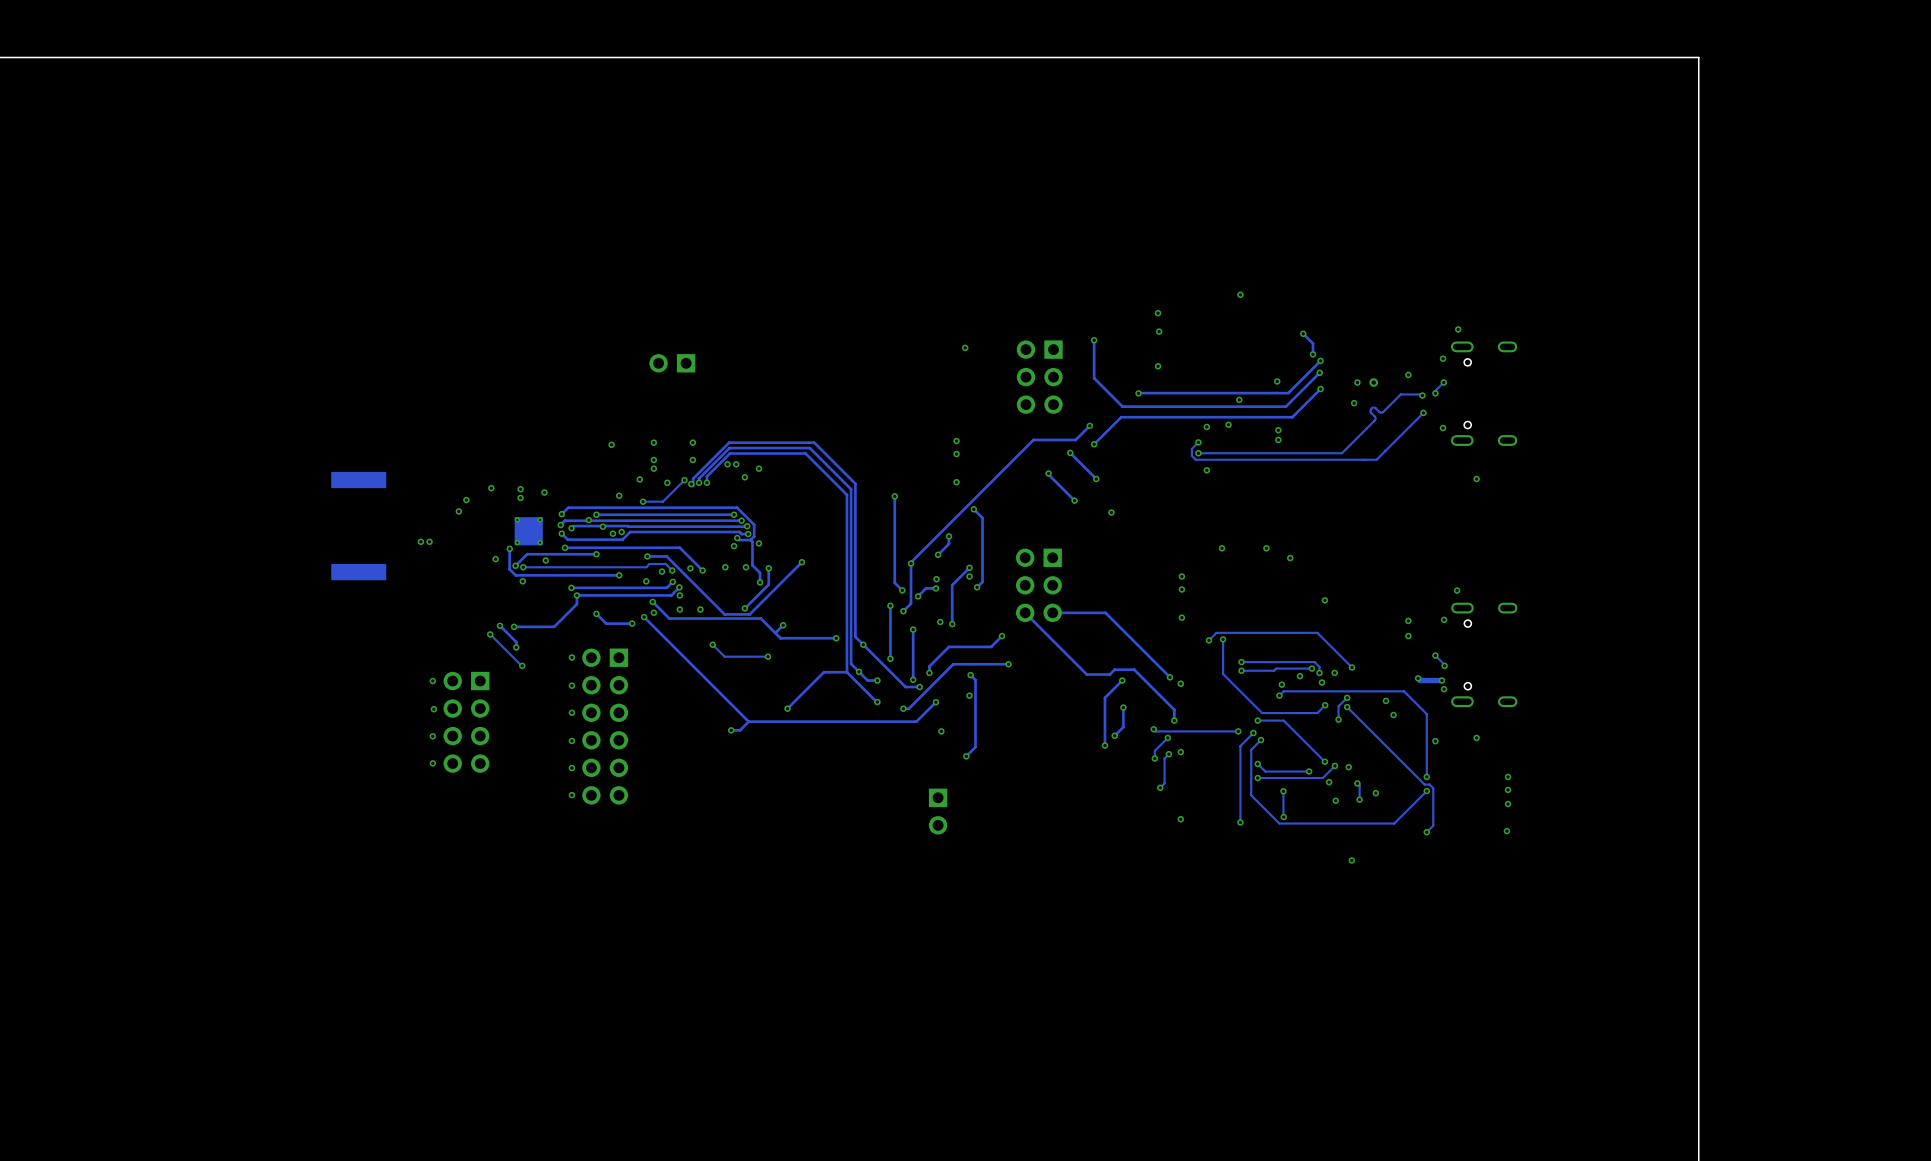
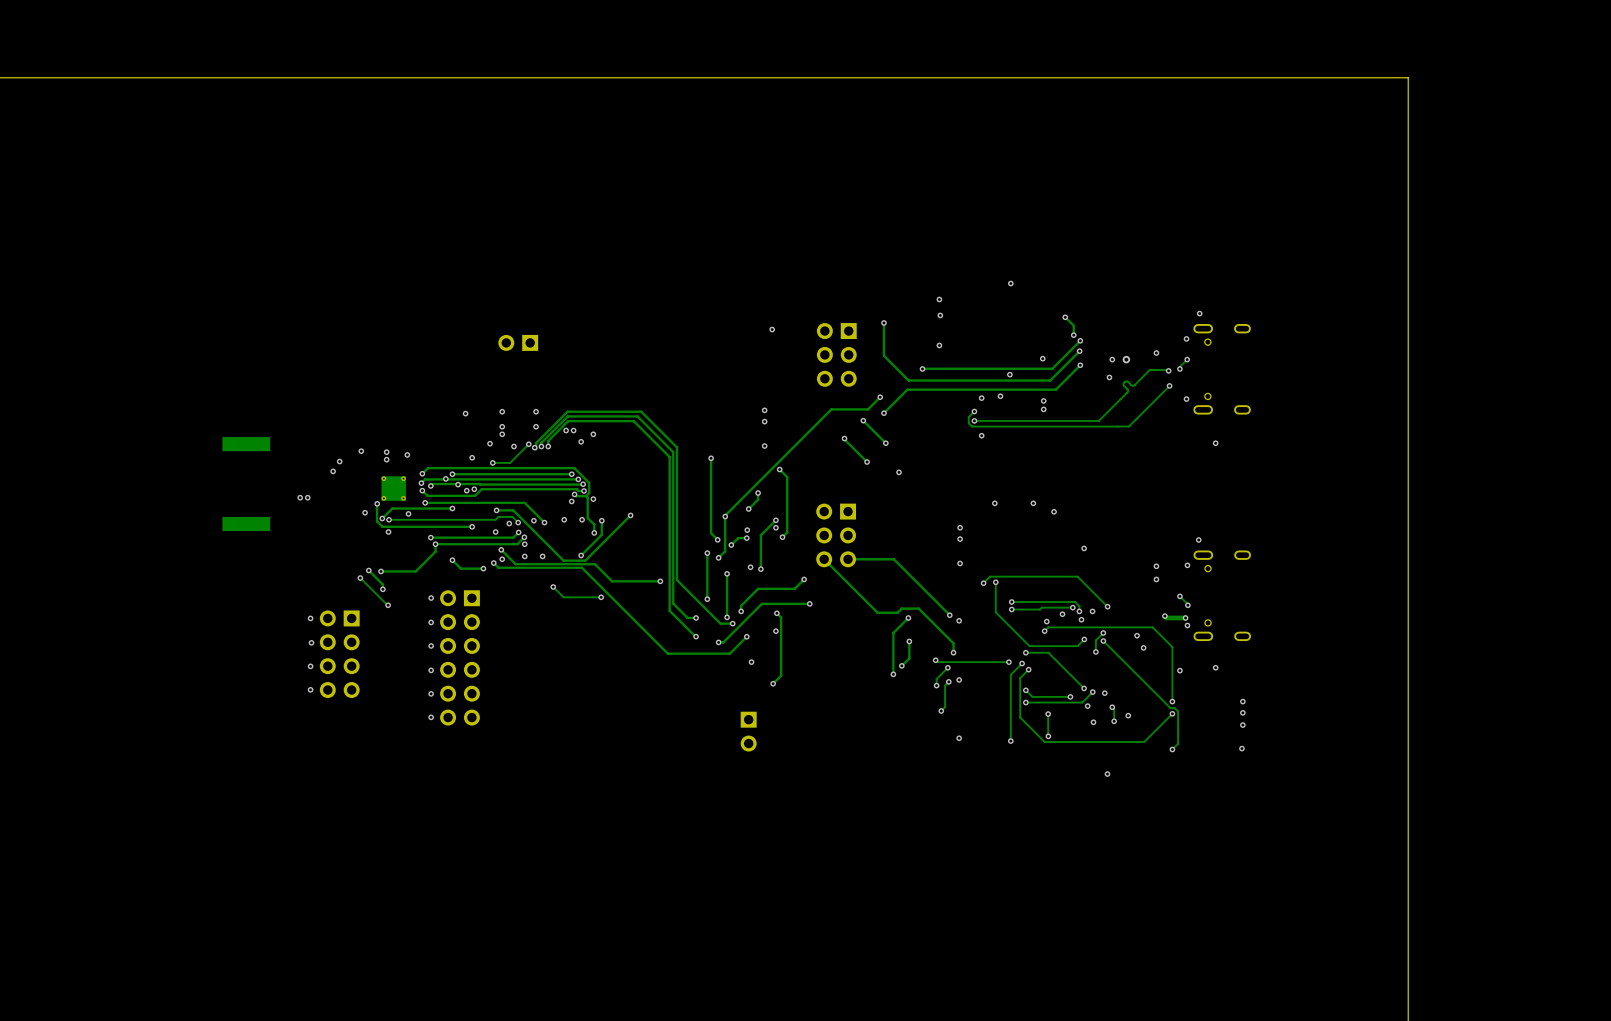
track: (649, 622) (748, 721) -> (498, 567) (581, 567) (667, 653)
track: (783, 625) (775, 633) -> none
via: (783, 625) -> none
via: (863, 644) -> none
via: (859, 671) -> none
track: (846, 672) (823, 672) (787, 708) -> none
via: (787, 708) -> none
track: (748, 721) (740, 730) (731, 730) -> none
track: (844, 721) (748, 721) -> none
via: (731, 730) -> none

